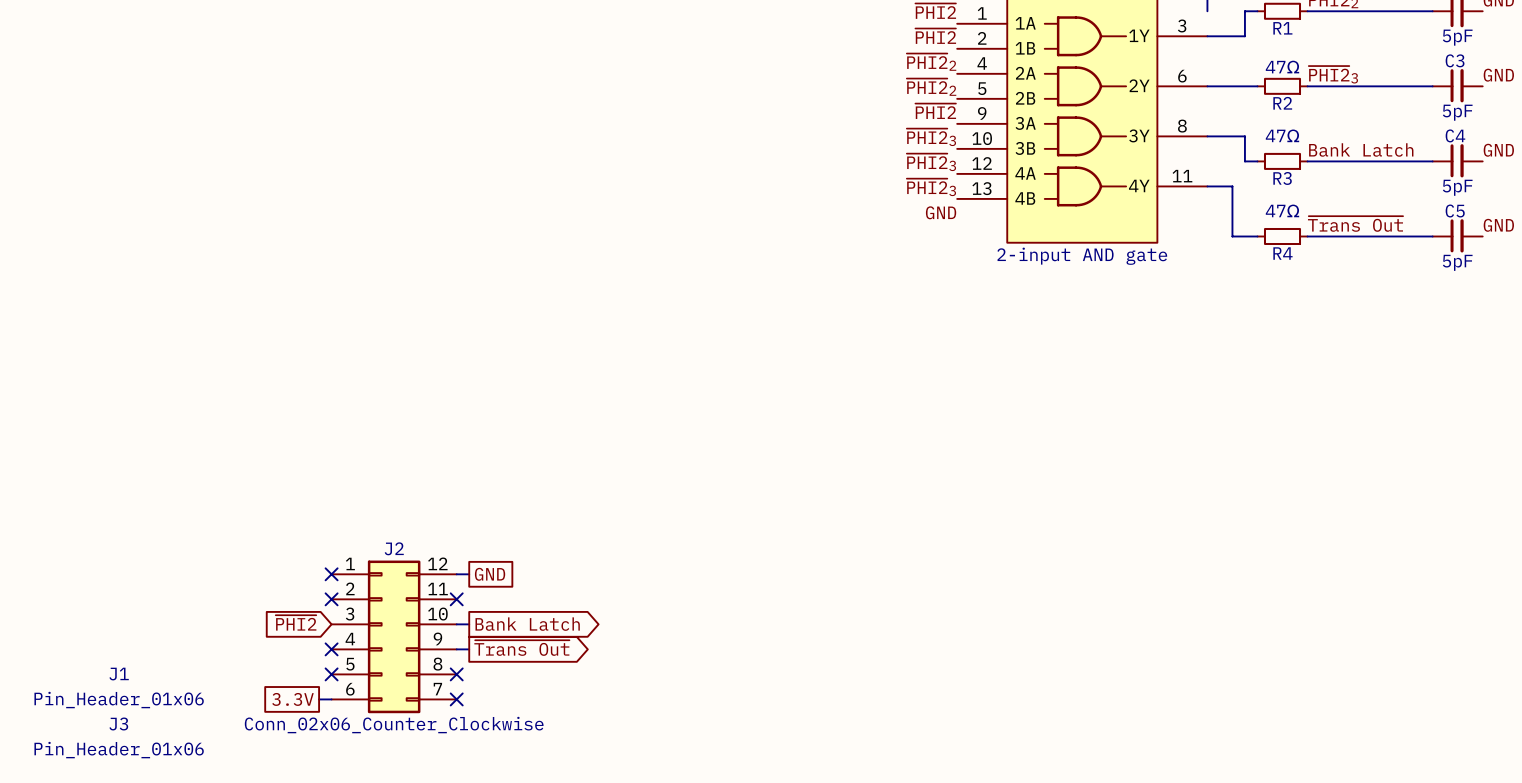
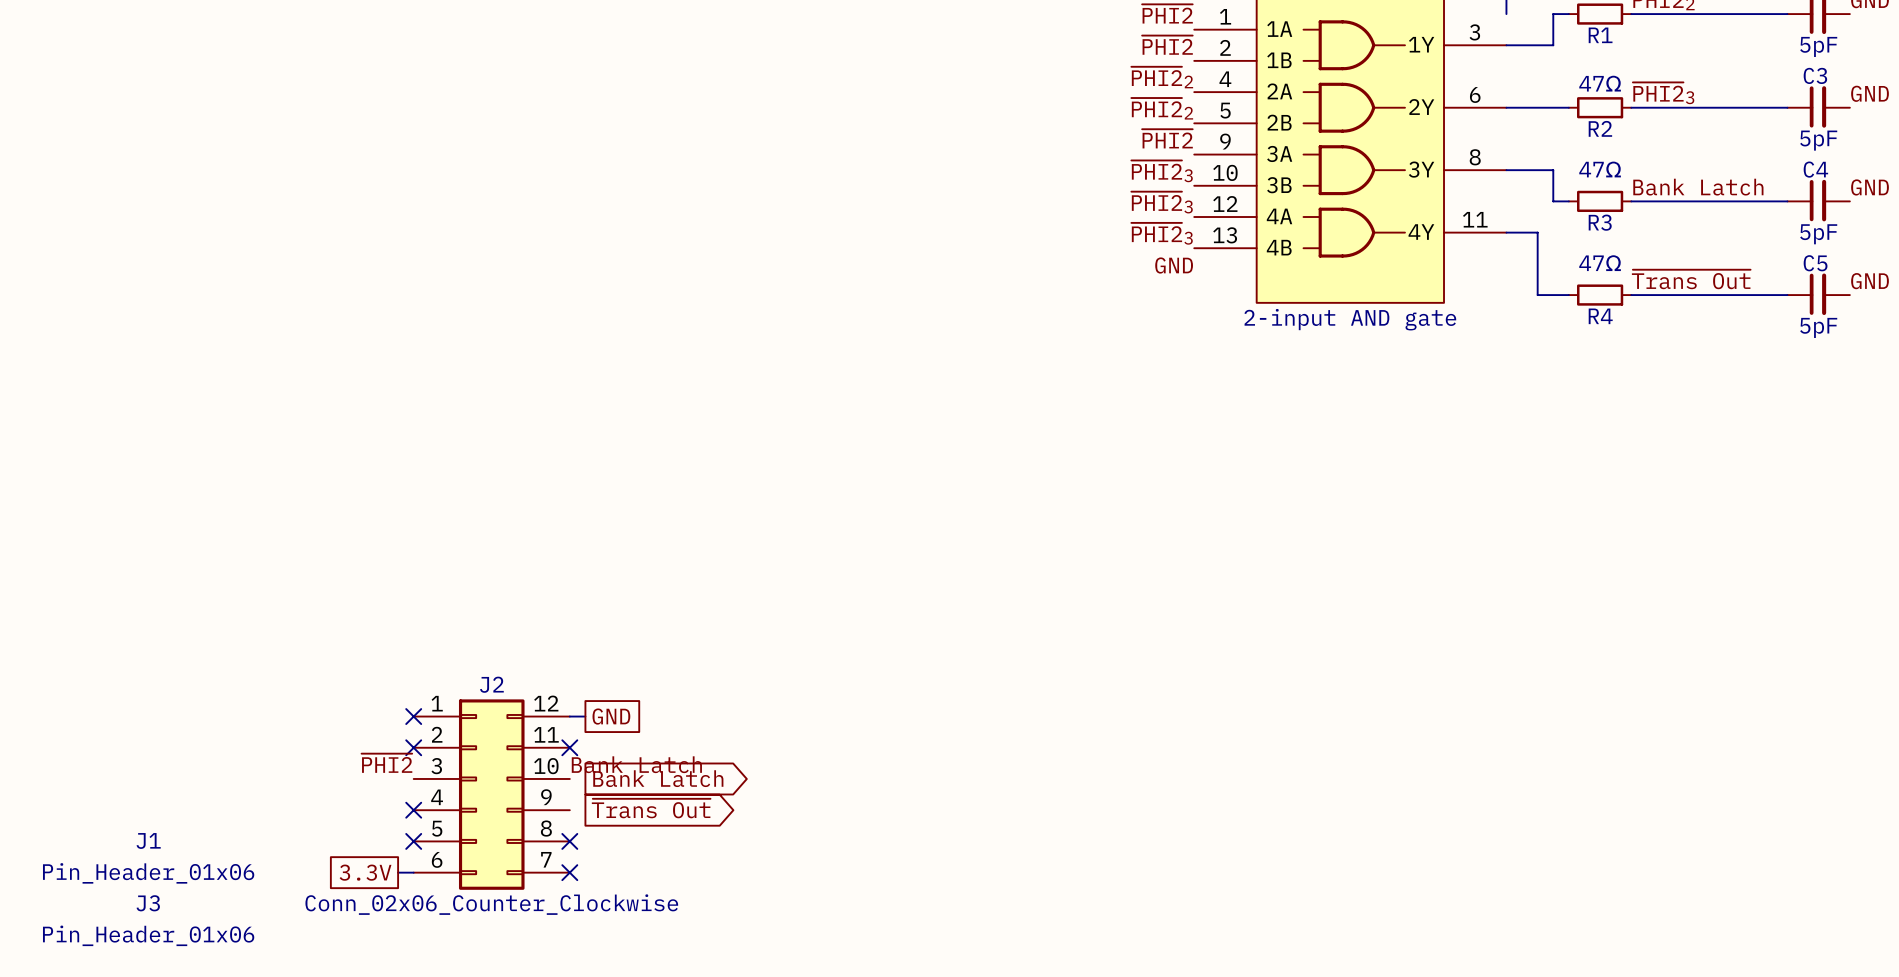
label: none -> ~{PHI2} (386, 763)
label: none -> Bank Latch (636, 764)
global label: ~{PHI2} (296, 622) -> none
wire: (456, 624) (469, 624) -> none
wire: (456, 649) (469, 649) -> none

